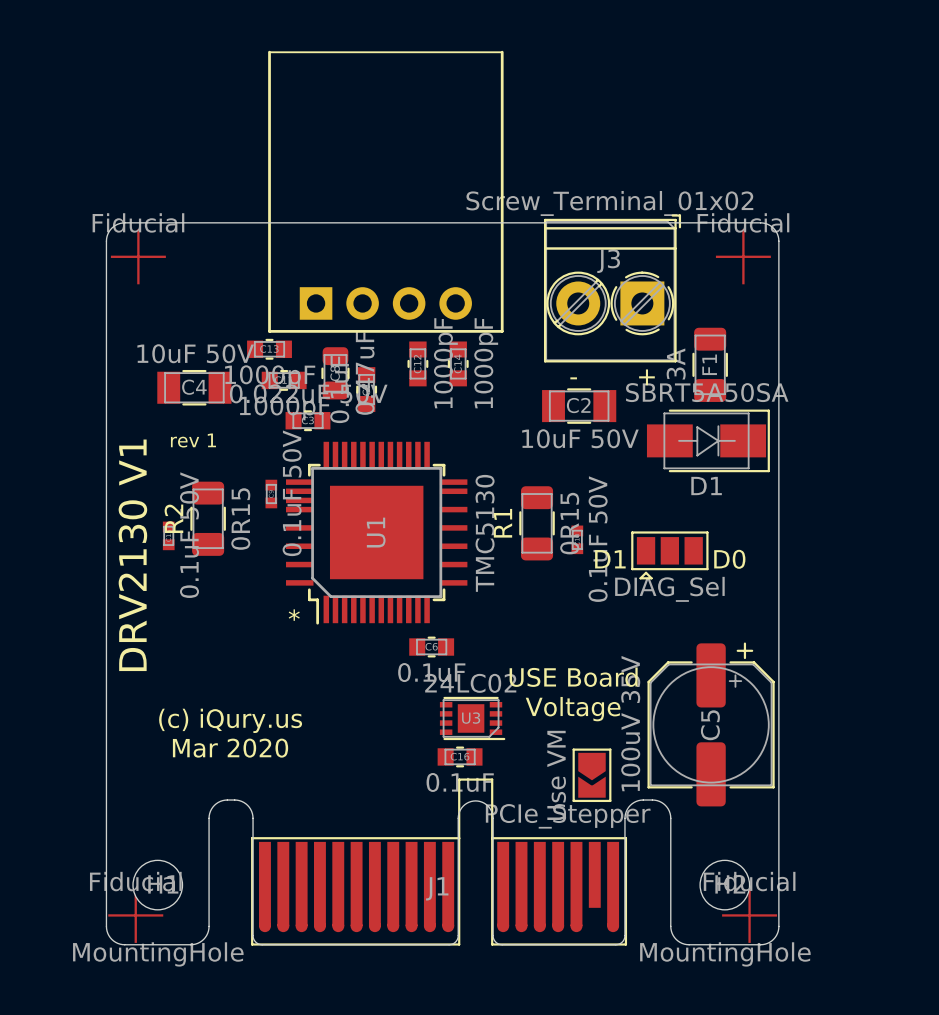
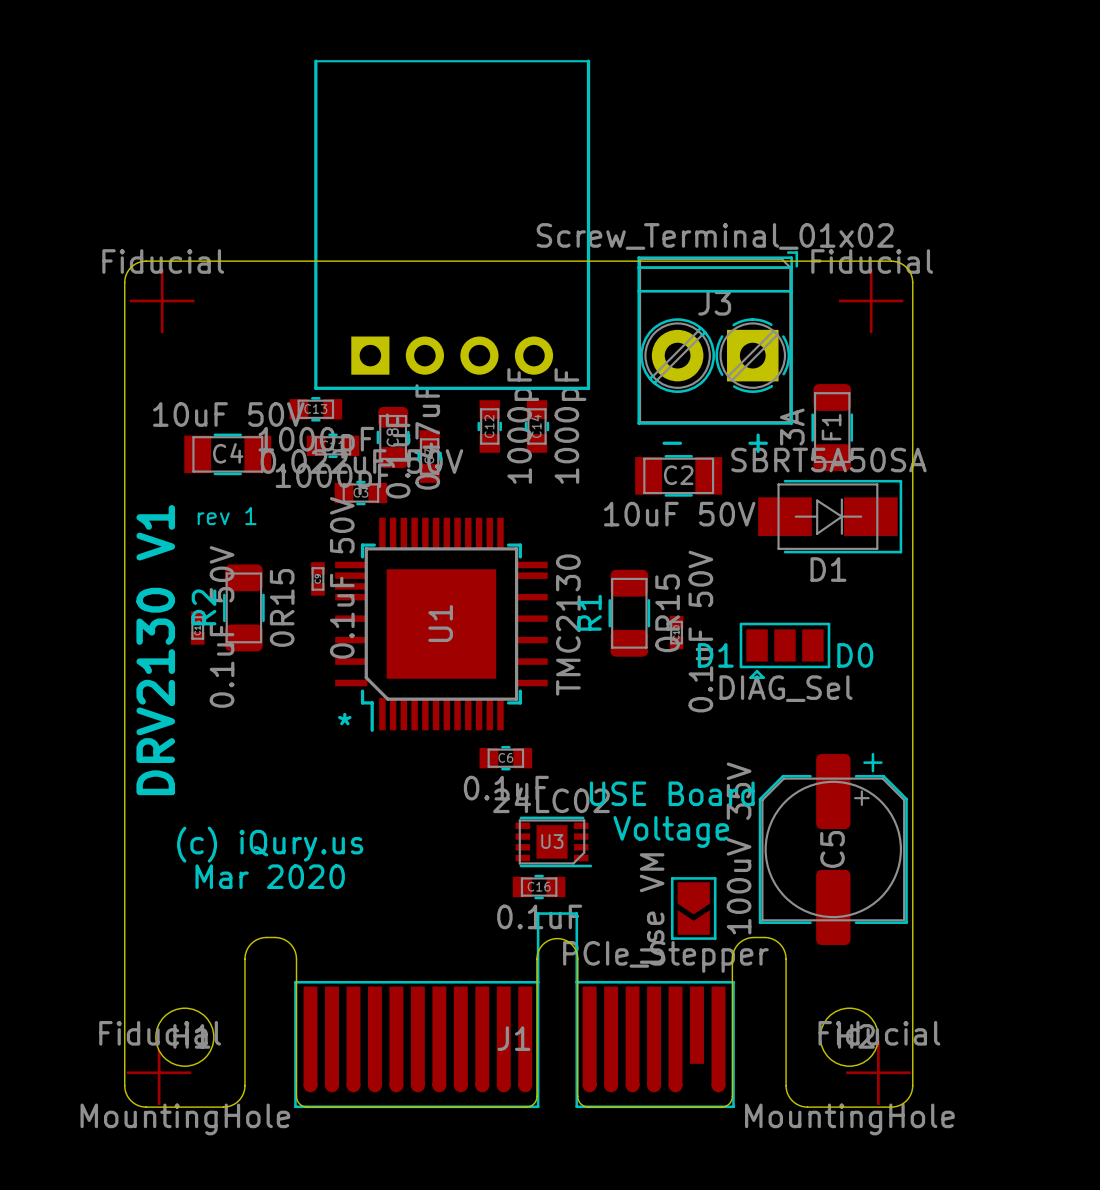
U1 value: TMC5130 (485, 533) -> TMC2130 (568, 625)

